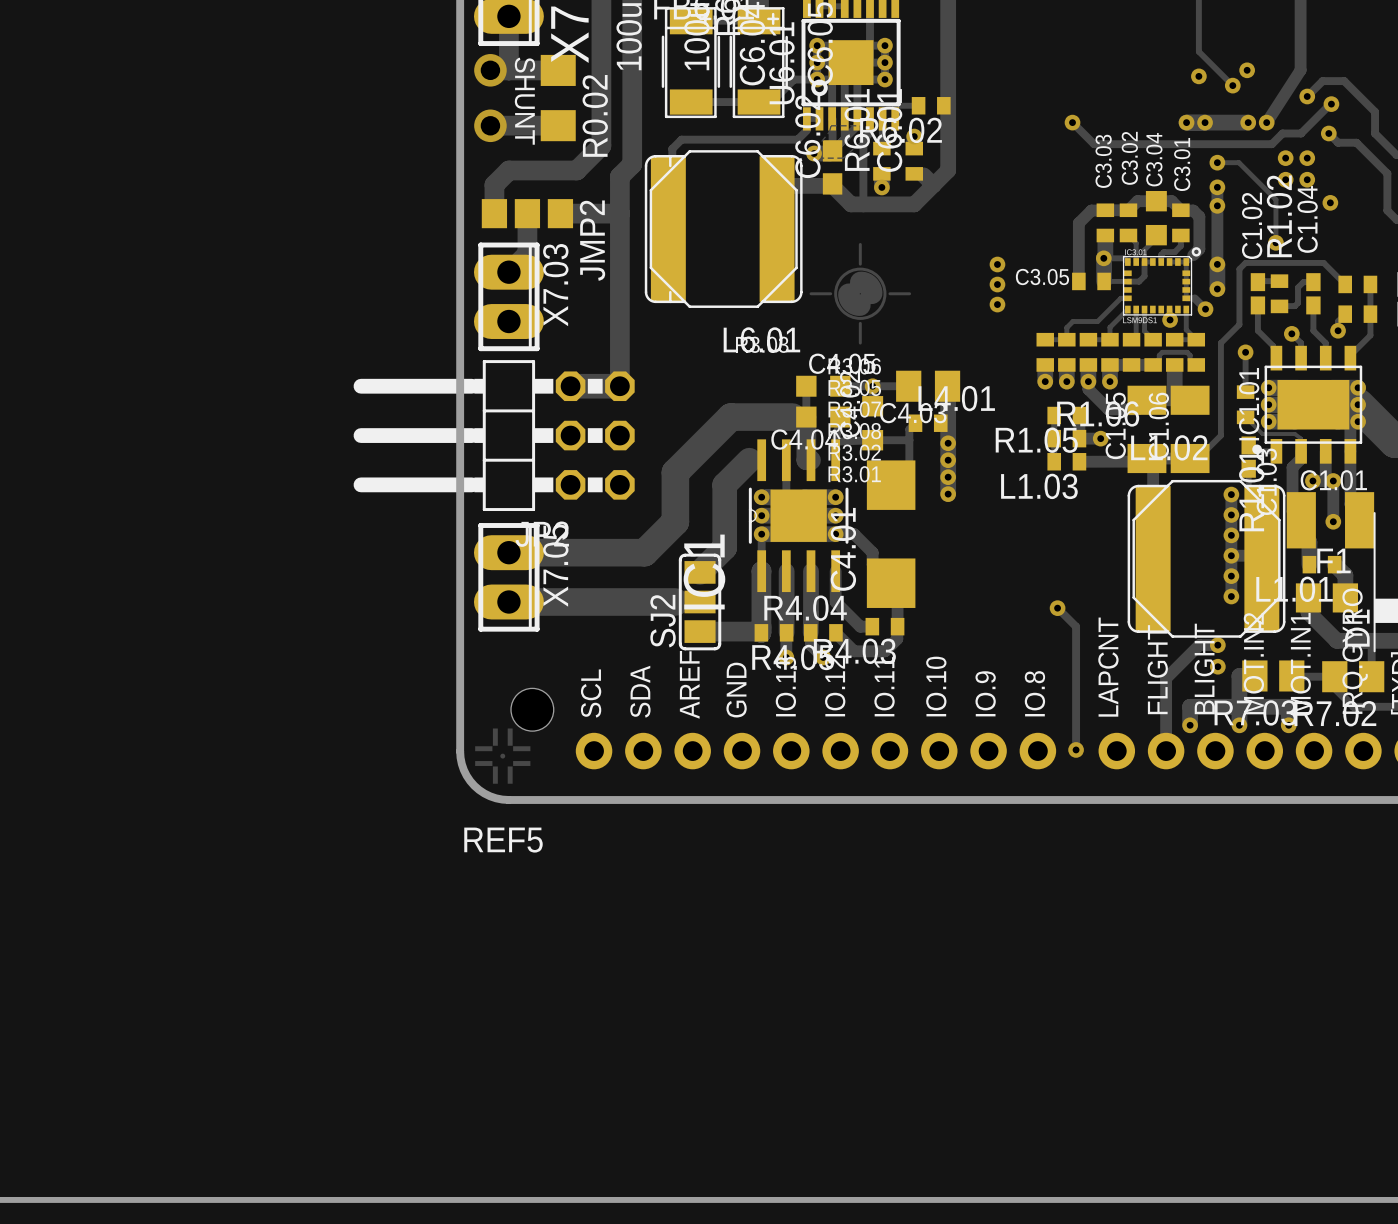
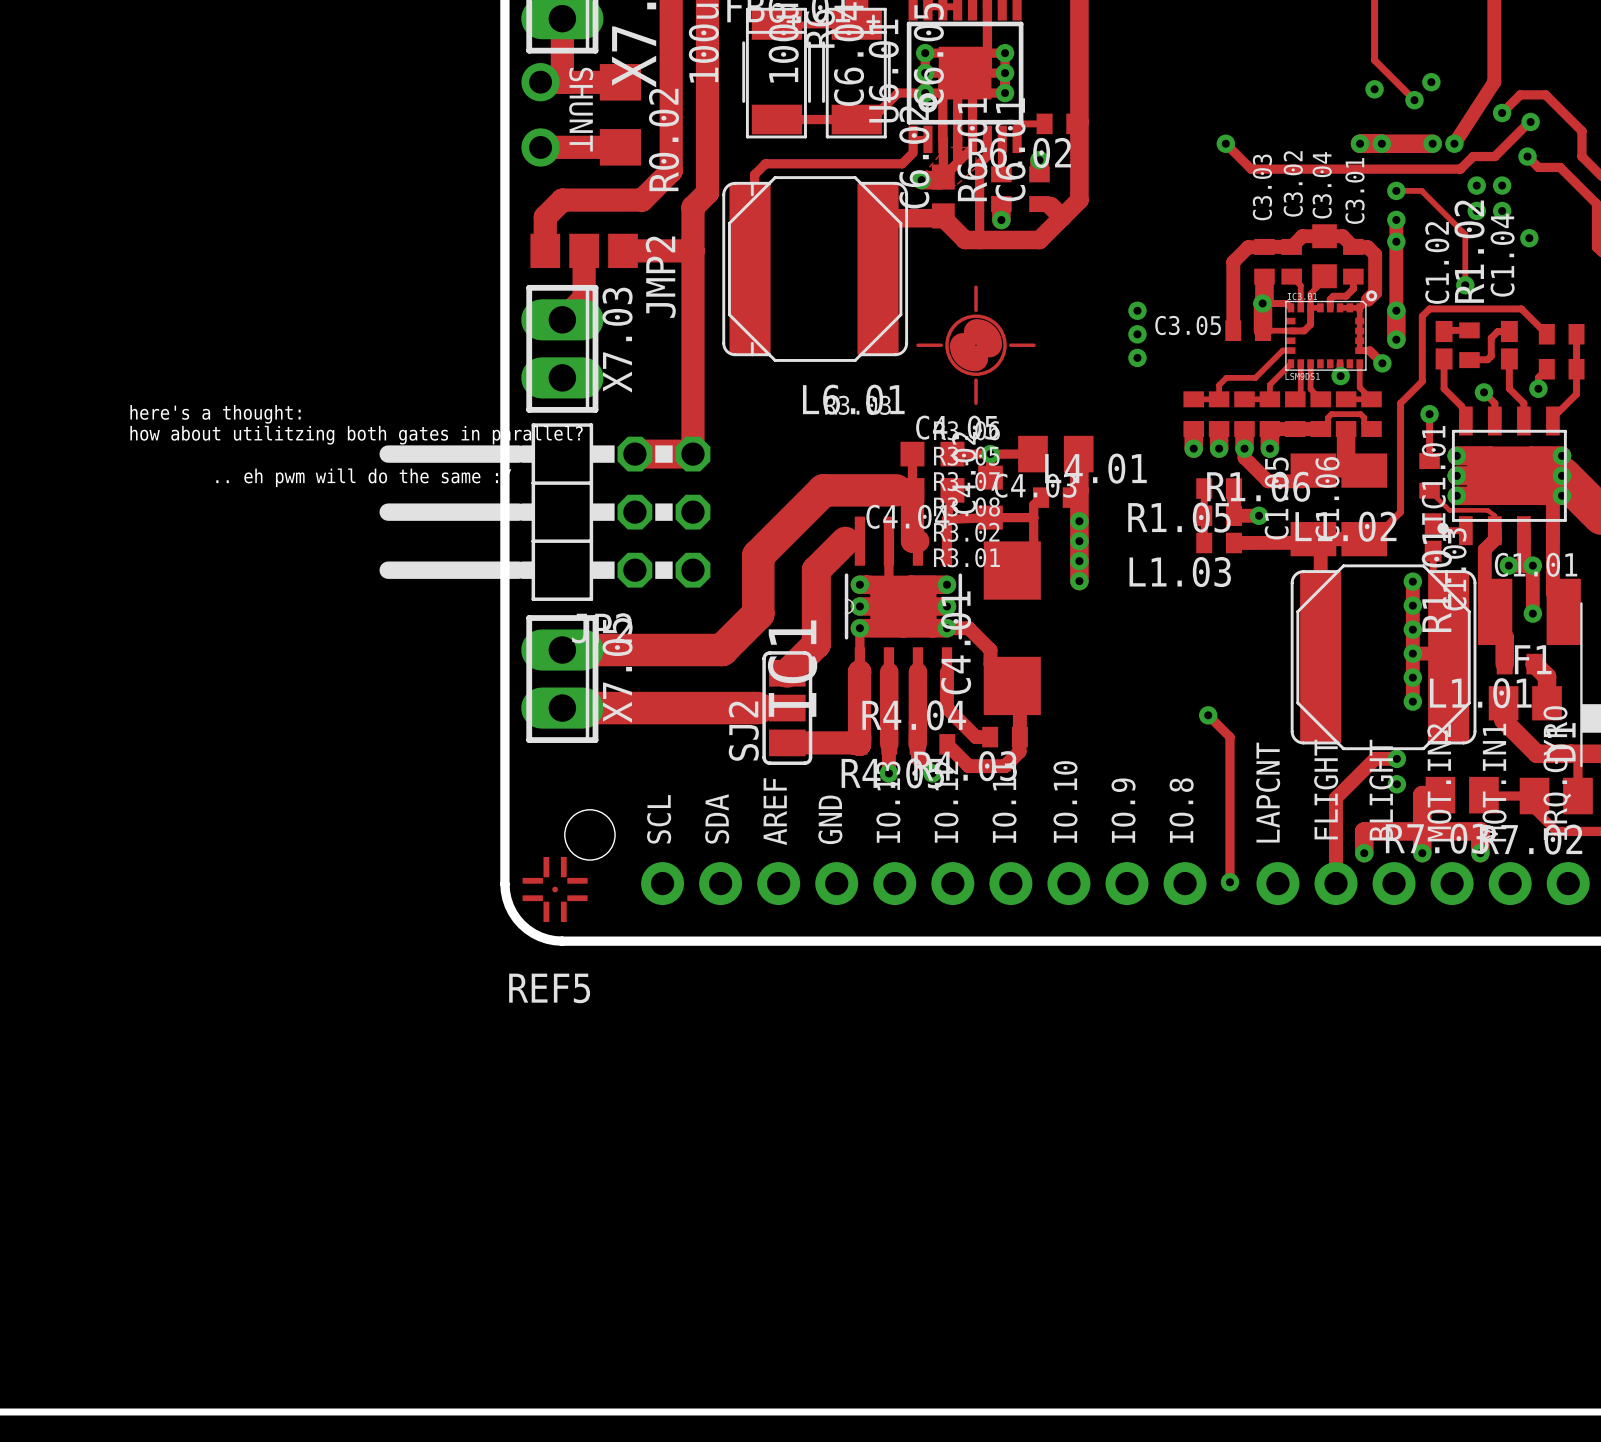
text: none -> here's a thought: (215, 414)
text: none -> how about utilitzing both gates in parallel? (356, 435)
text: none -> .. eh pwm will do the same :/ (363, 477)

